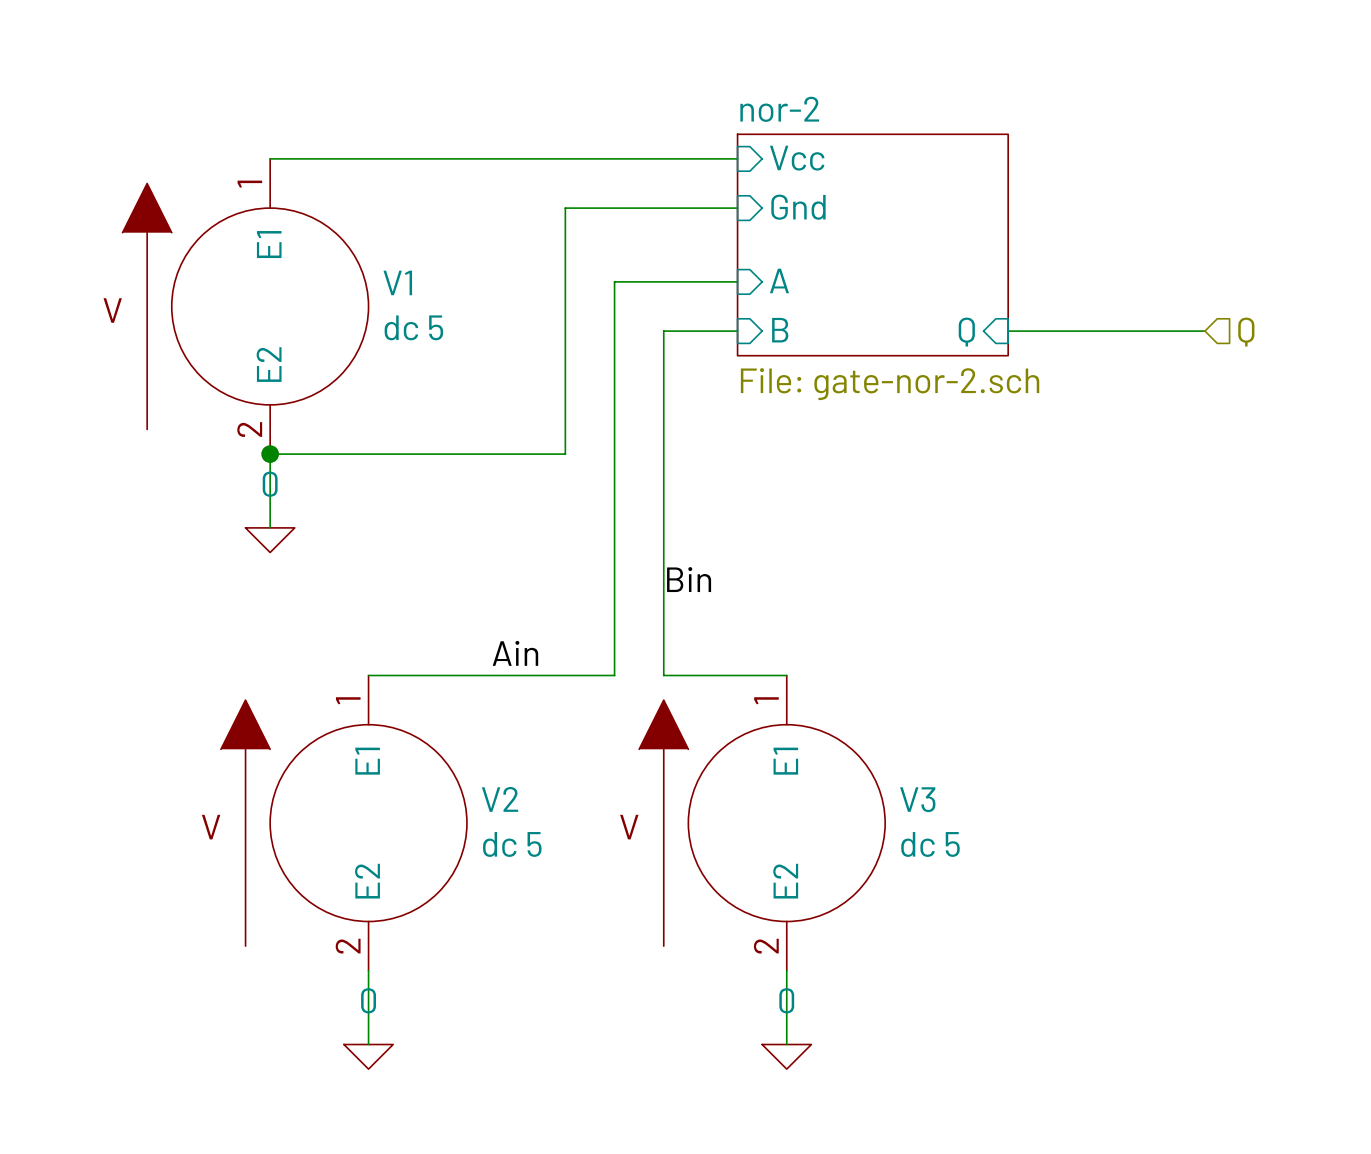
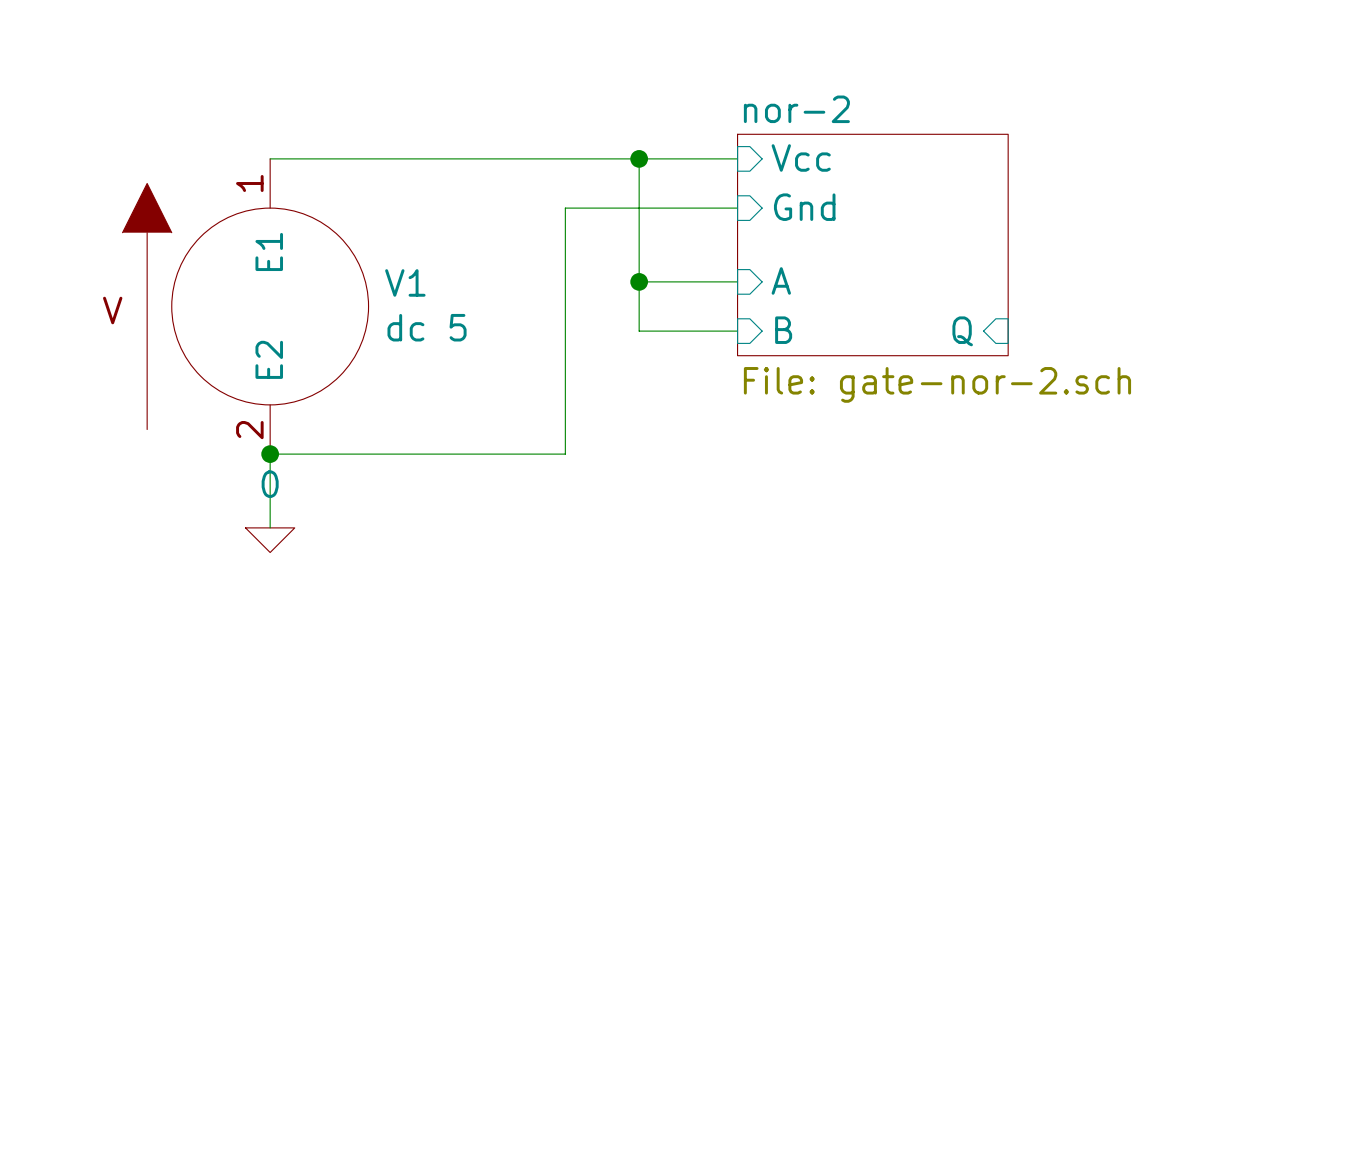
junction: none -> (639, 158)
wire: (639, 281) (614, 281) (614, 675) (368, 675) -> none
junction: none -> (639, 281)
wire: (663, 331) (663, 675) (786, 675) -> (663, 331) (639, 331) (639, 158)
wire: (1008, 331) (1204, 331) -> none
hierarchical label: Q (1246, 332) -> none
label: Bin (689, 579) -> none
label: Ain (515, 653) -> none
V2: dc 5 (343, 823) -> none
V3: dc 5 (762, 823) -> none
wire: (368, 970) (368, 1044) -> none
wire: (786, 970) (786, 1044) -> none
power symbol: 0 (368, 1056) -> none
power symbol: 0 (786, 1056) -> none

